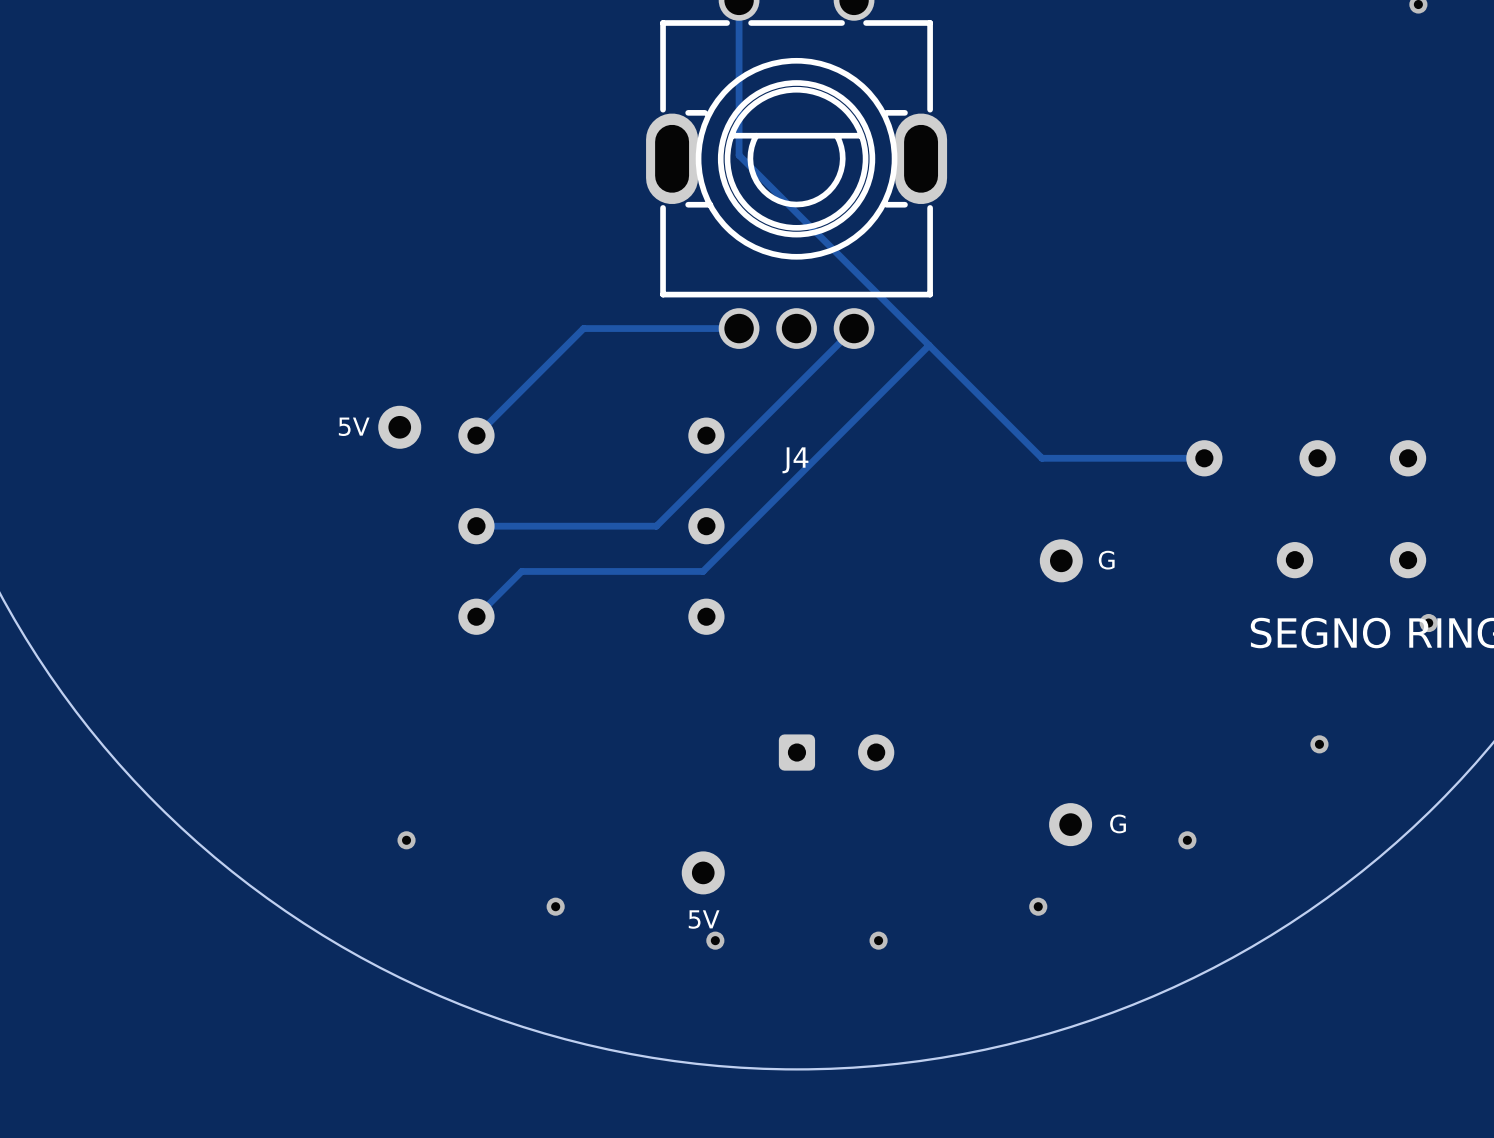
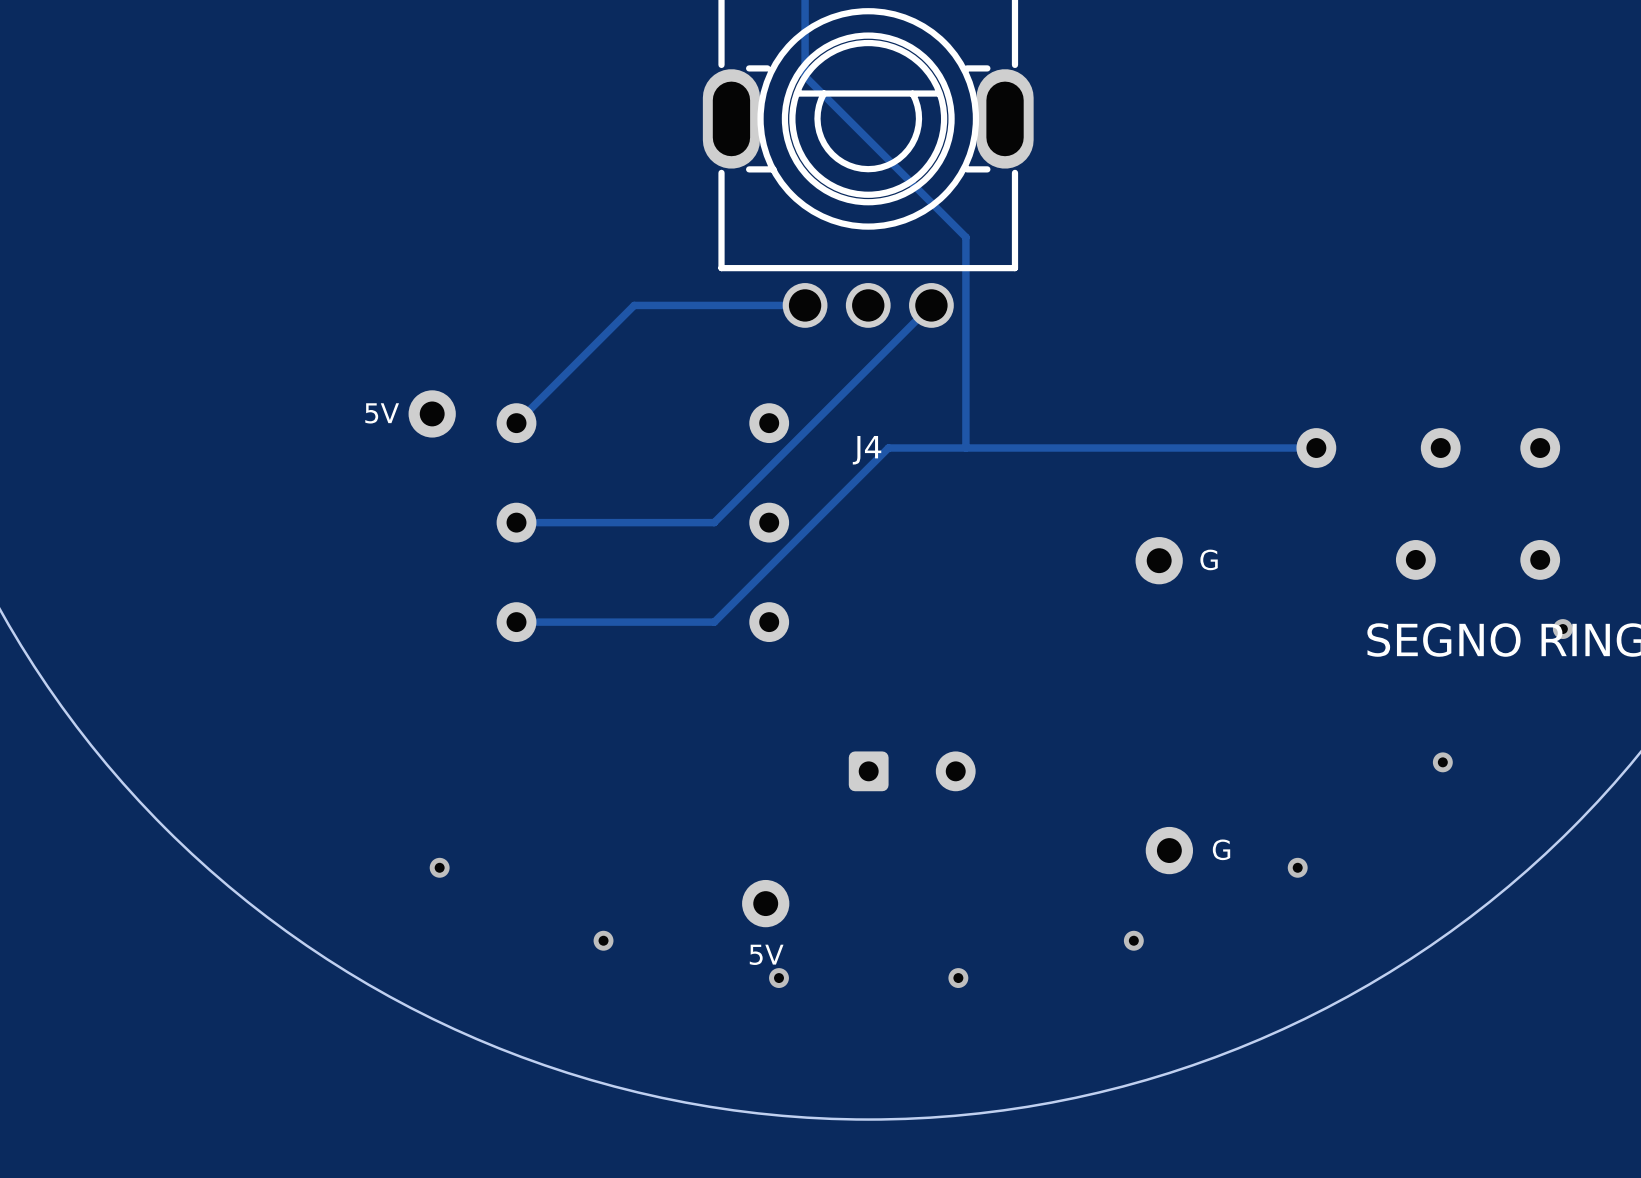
track: (739, 120) (739, 155) (1042, 458) -> (805, 76) (965, 237) (965, 448)
track: (929, 345) (703, 571) (521, 571) (476, 616) -> (1137, 448) (888, 448) (714, 622) (516, 622)

